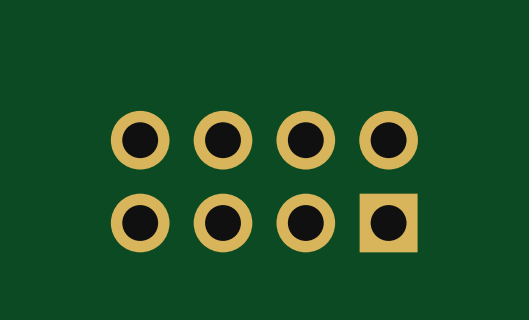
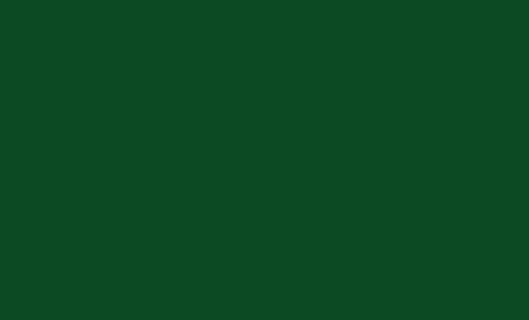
part: (264, 181) -> none

